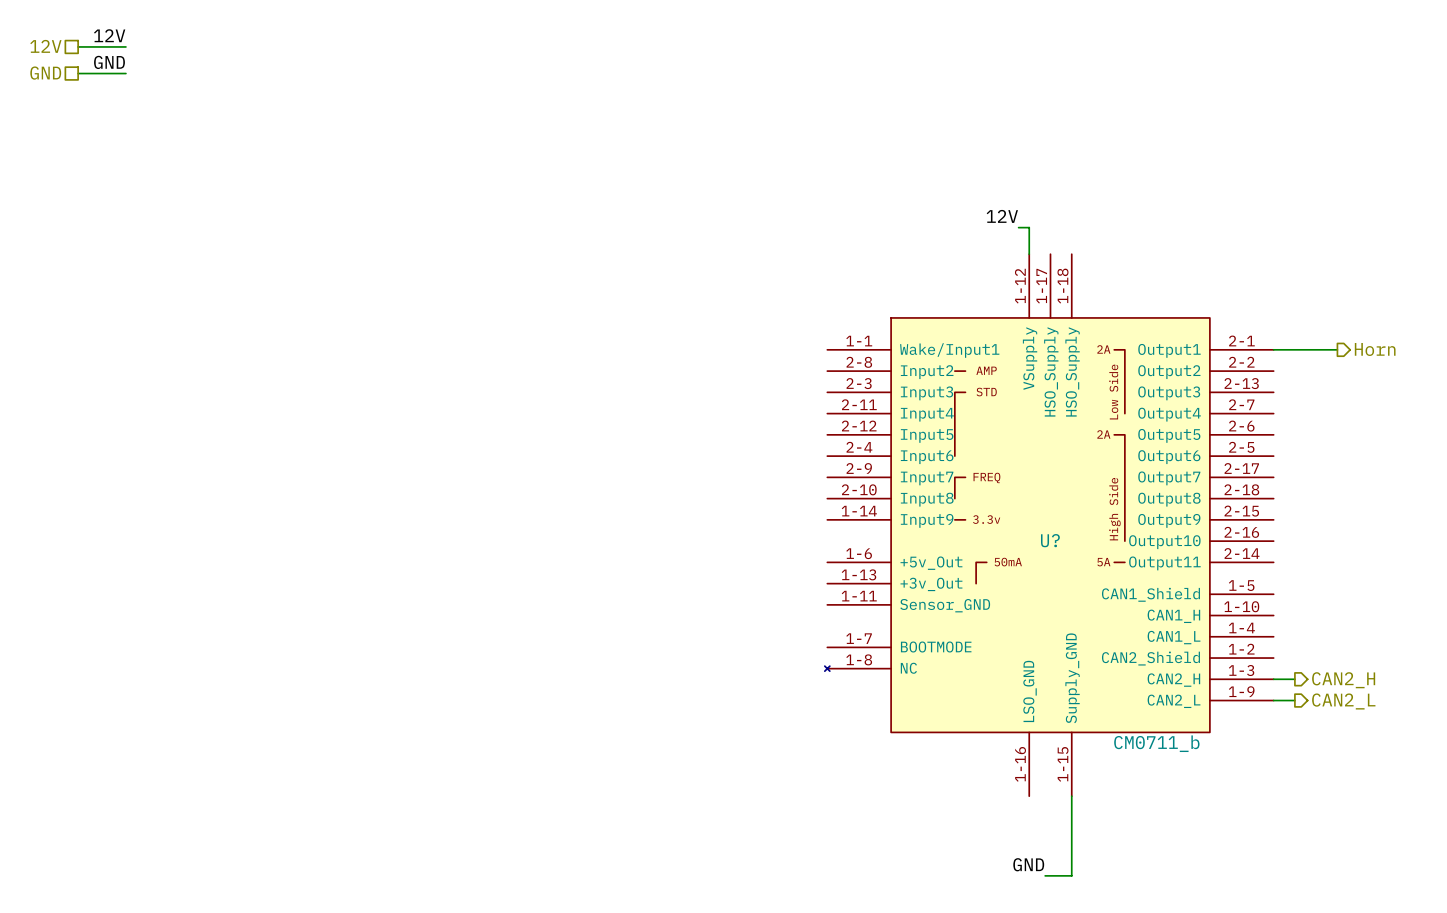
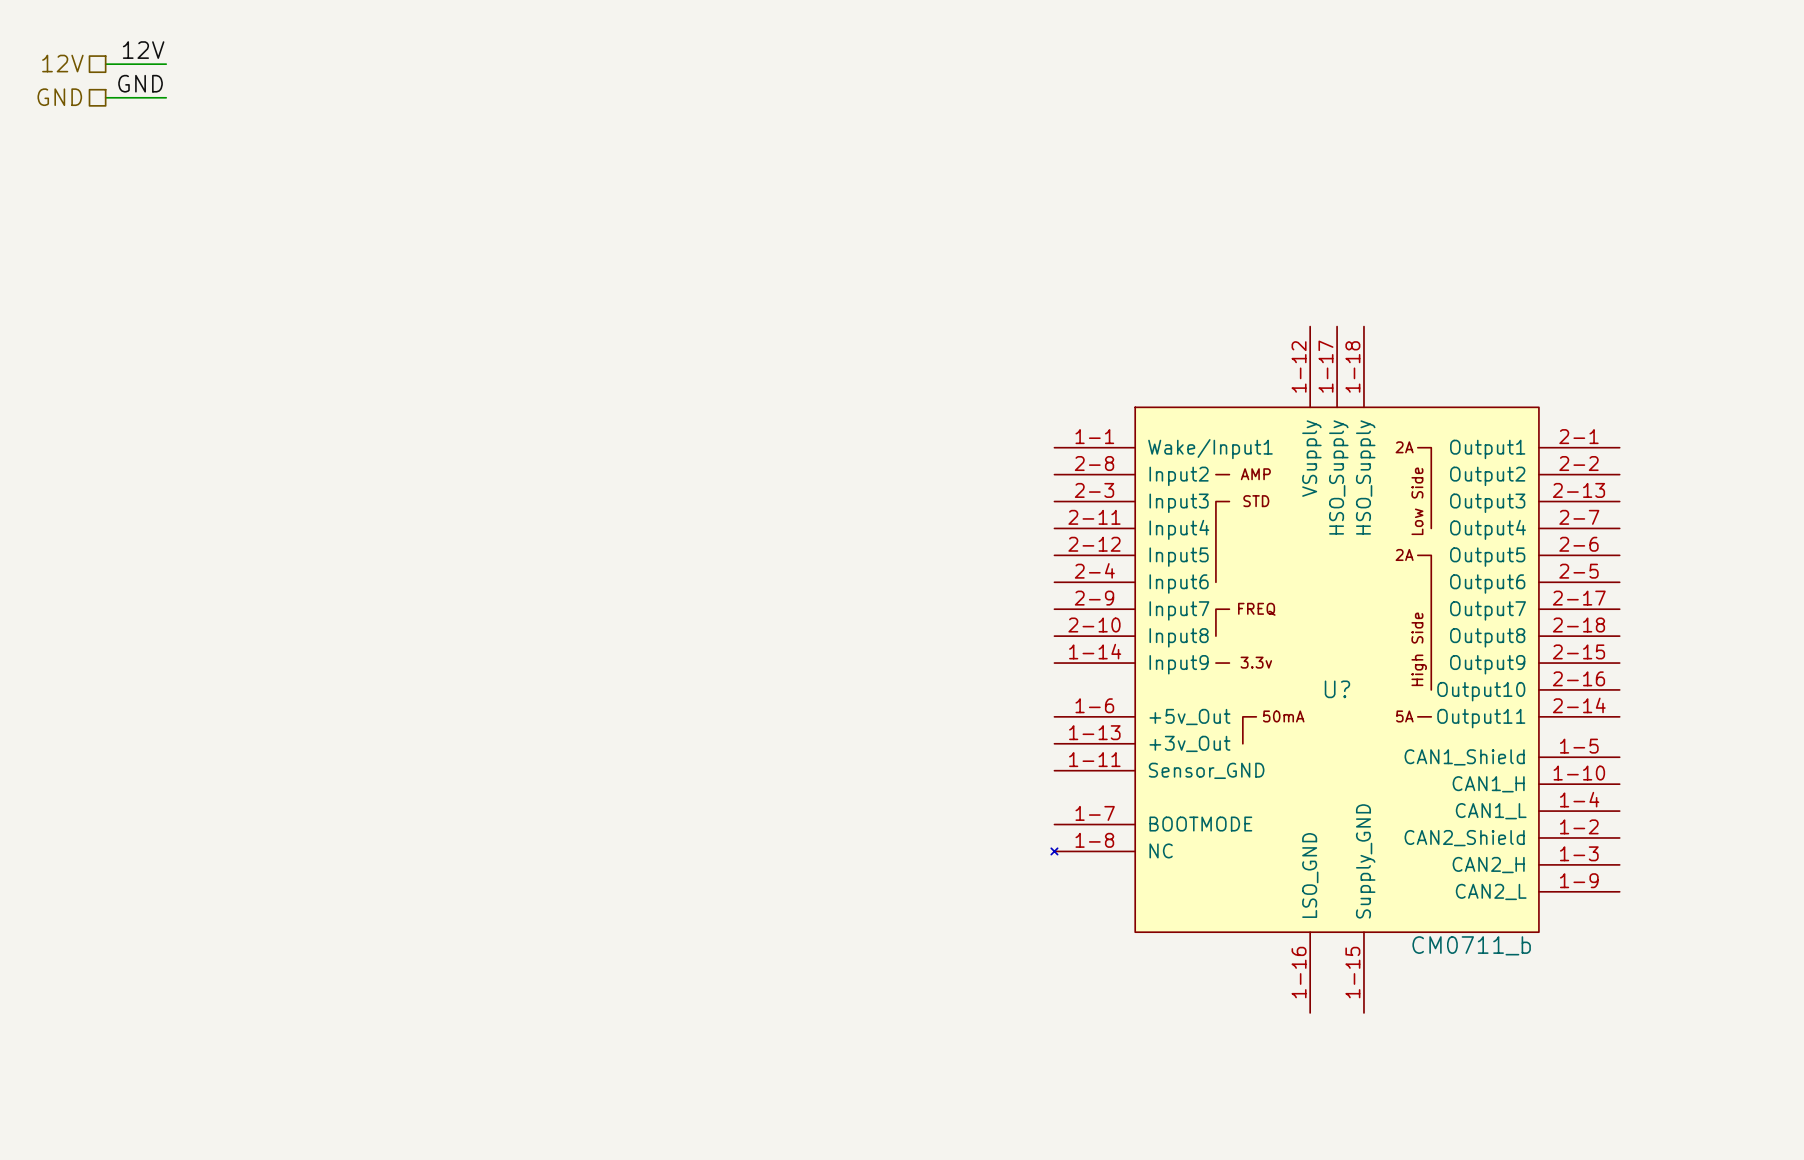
label: 12V (1002, 216) -> none
wire: (1018, 227) (1029, 227) (1029, 254) -> none
wire: (1273, 349) (1337, 349) -> none
hierarchical label: Horn (1375, 349) -> none
wire: (1273, 679) (1294, 679) -> none
hierarchical label: CAN2_H (1343, 680) -> none
wire: (1273, 700) (1294, 700) -> none
hierarchical label: CAN2_L (1343, 701) -> none
wire: (1071, 796) (1071, 875) (1045, 875) -> none
label: GND (1028, 864) -> none

